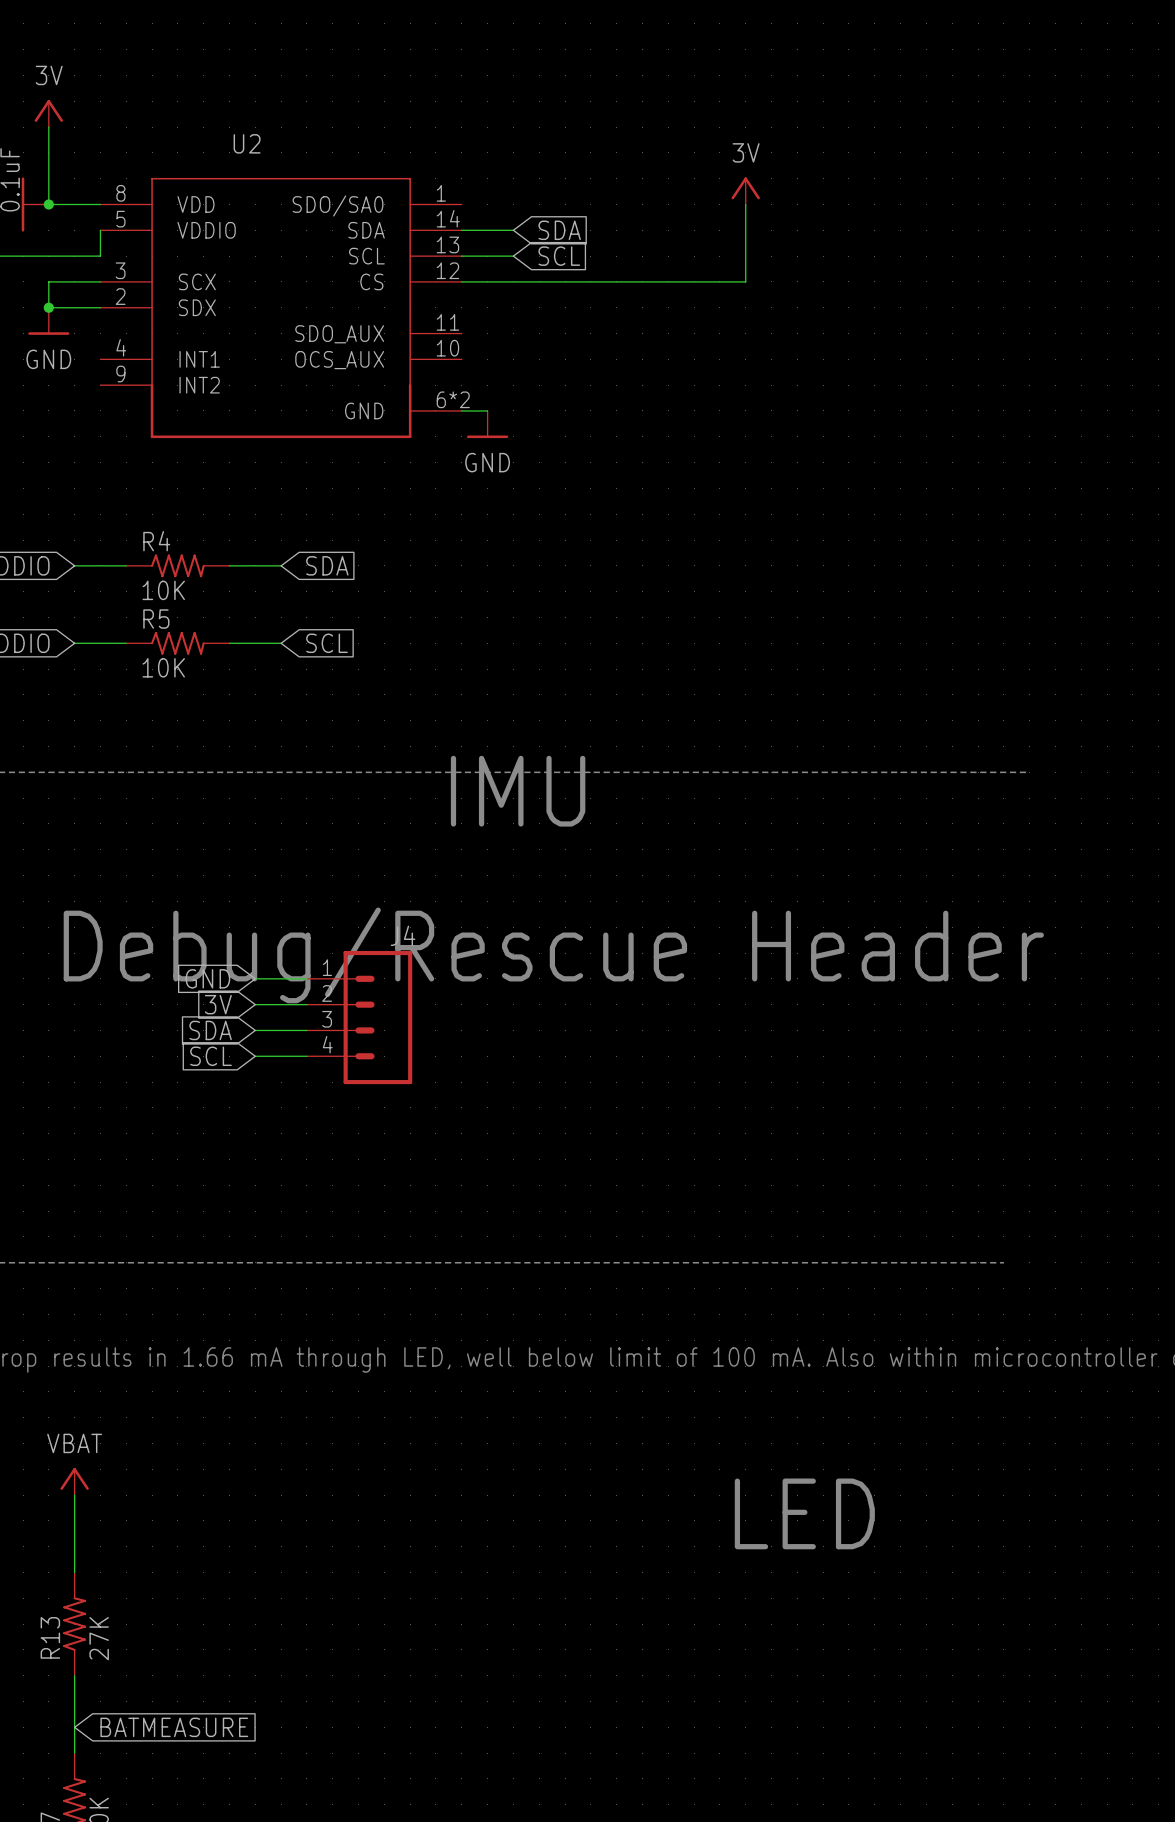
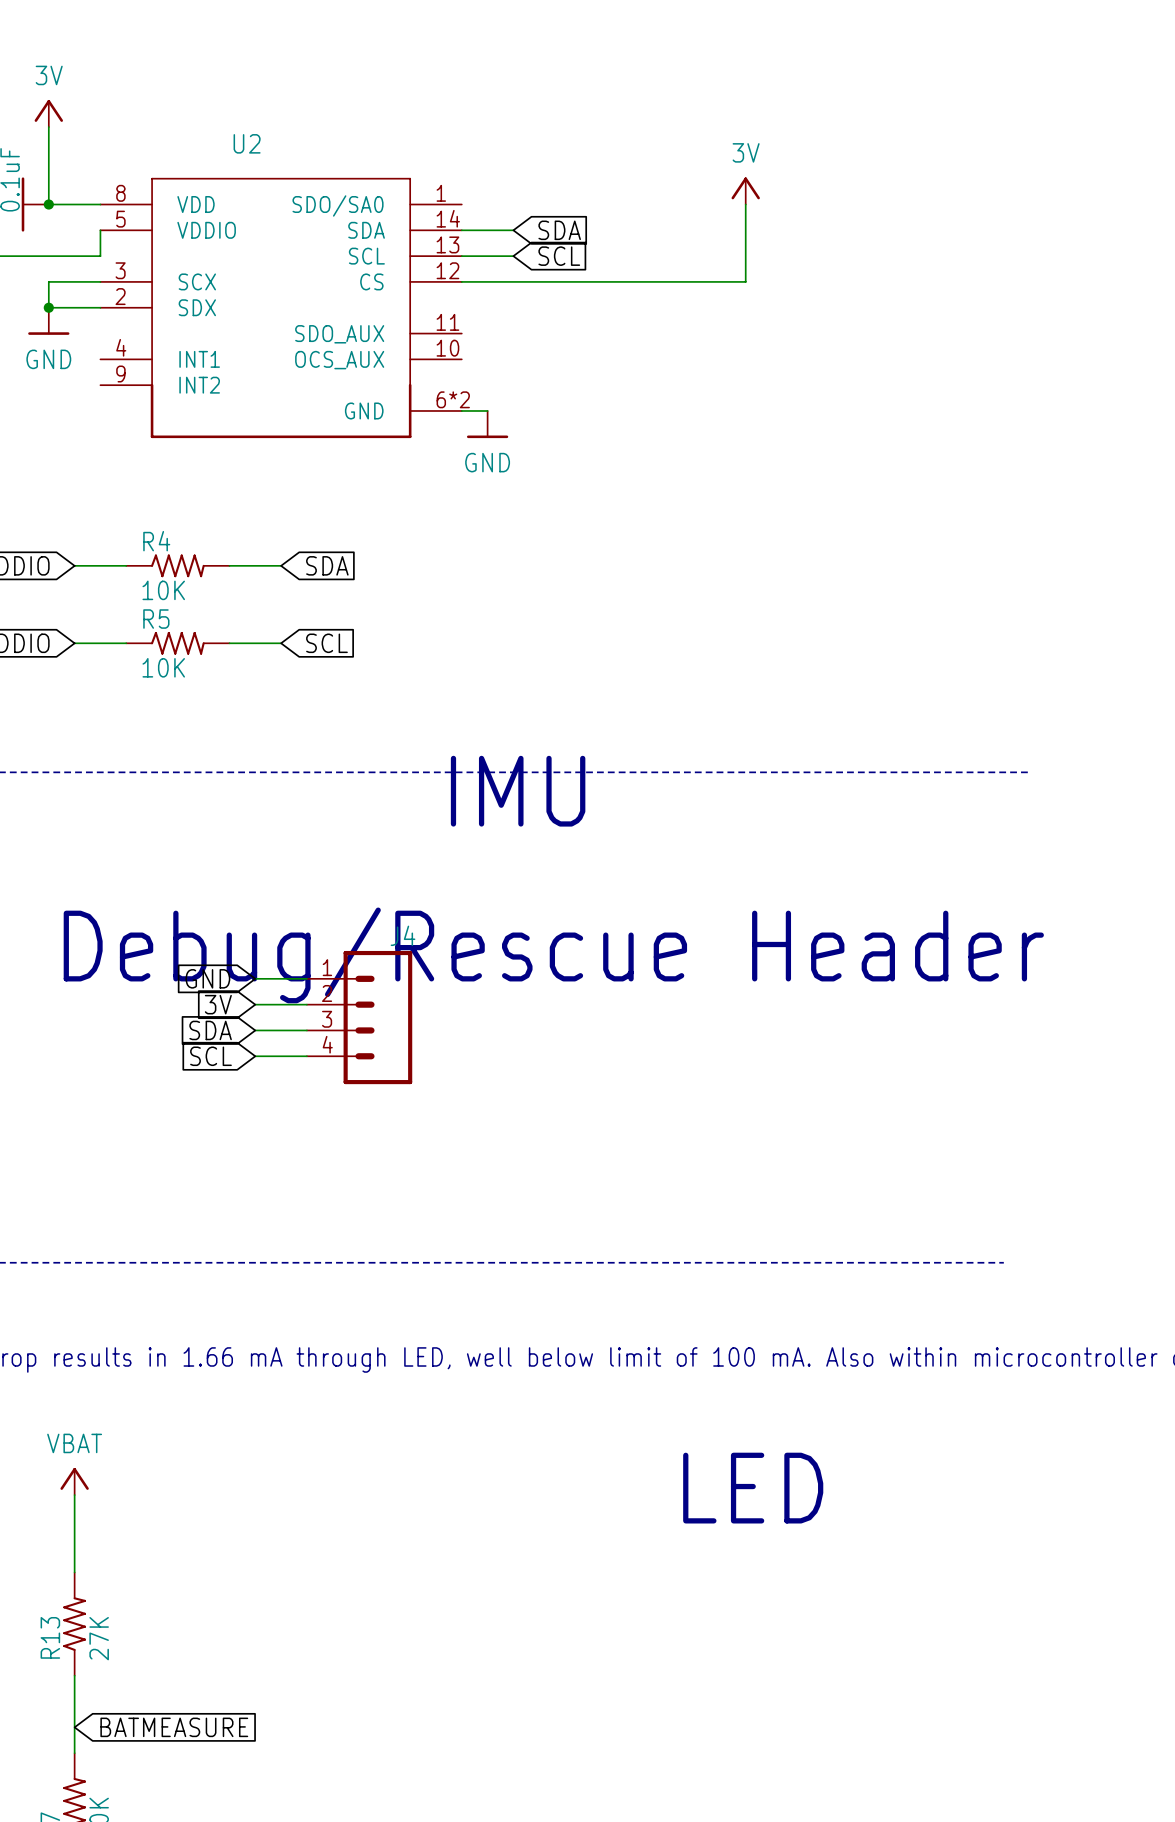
text position: LED (804, 1513) -> LED (753, 1488)

